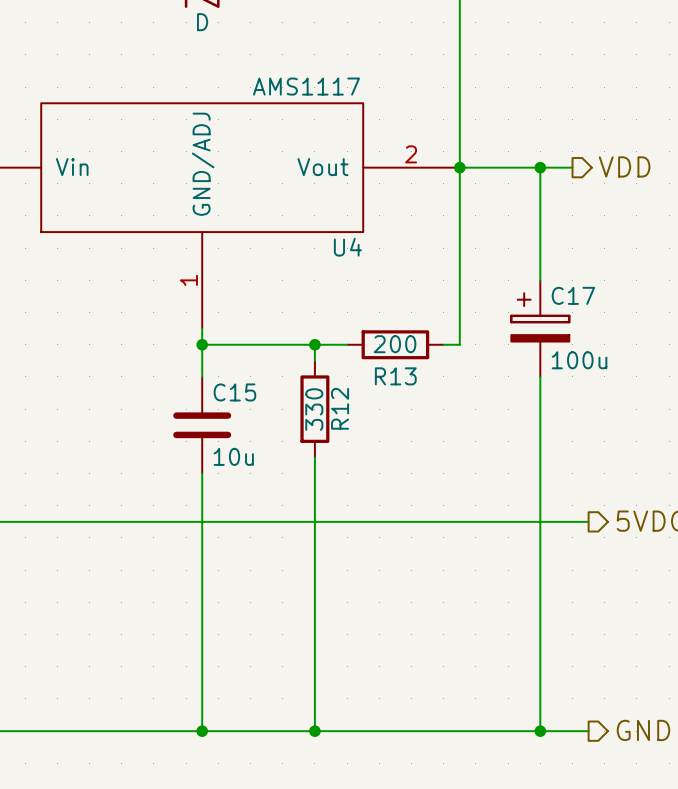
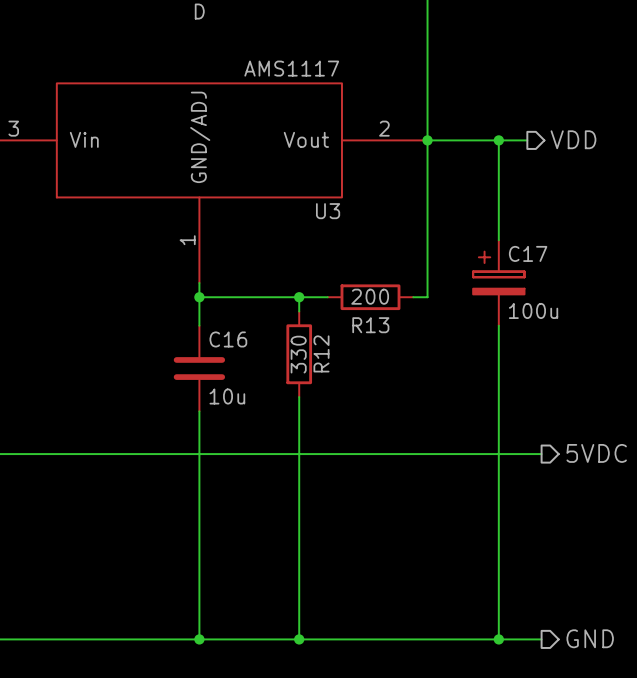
U4 name: U4 (347, 247) -> U3 (328, 211)
C15 name: C15 (234, 392) -> C16 (228, 339)

